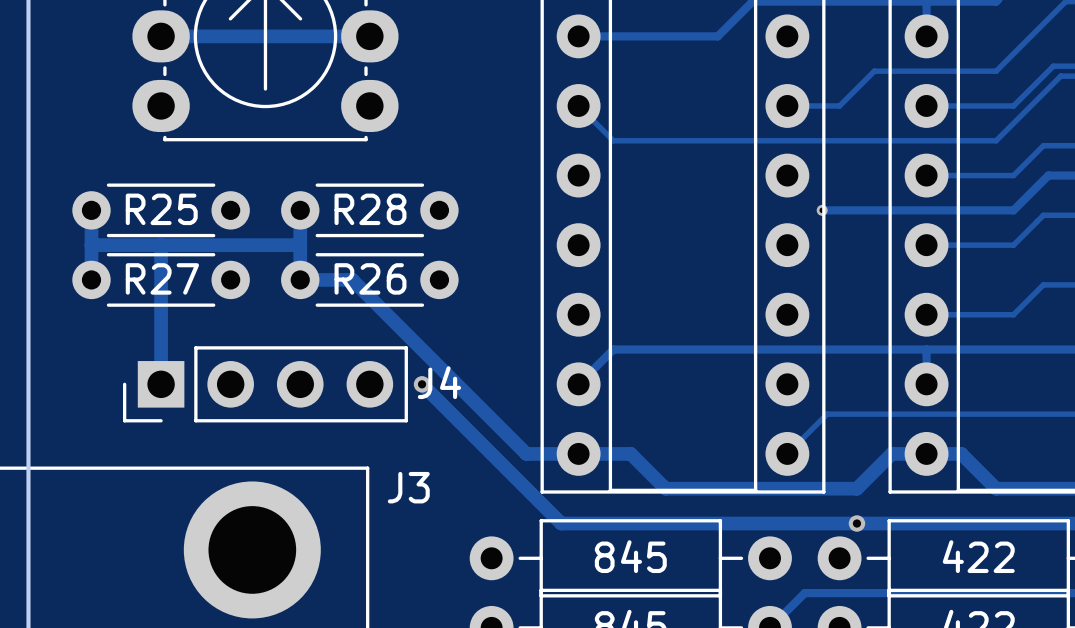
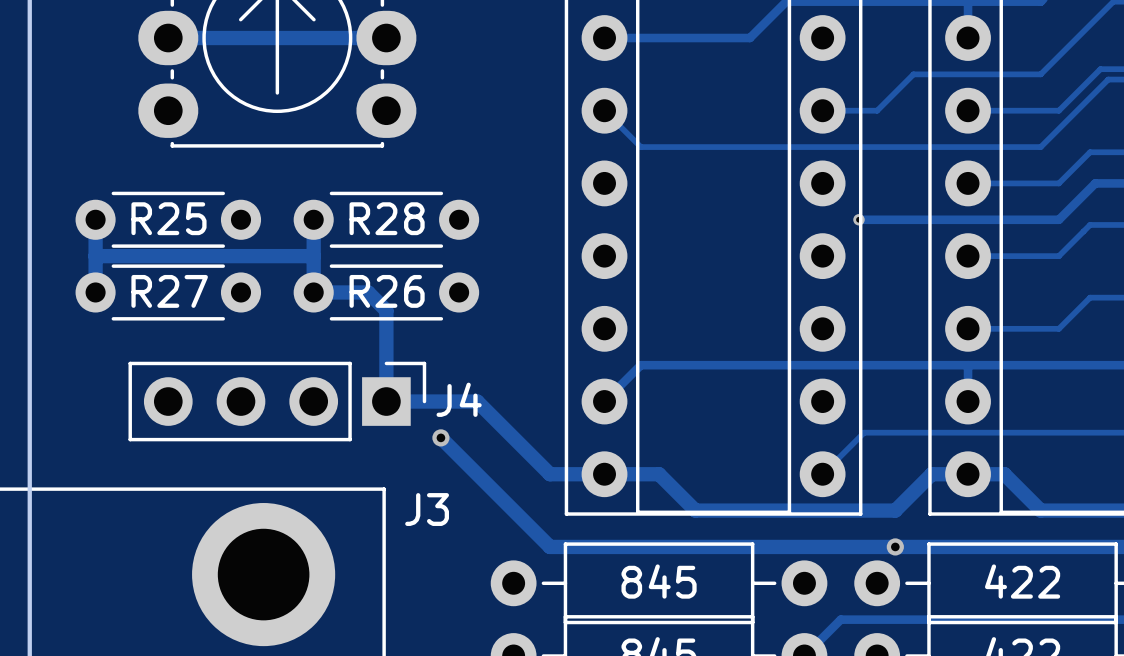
track: (161, 245) (161, 384) -> none
track: (369, 297) (456, 384) -> (386, 310) (386, 401) (477, 401)
J4 rotation: 0° (265, 384) -> 180° (277, 401)
track: (422, 384) (561, 523) -> (440, 437) (549, 546) (586, 546)
via position: (422, 384) -> (440, 437)

